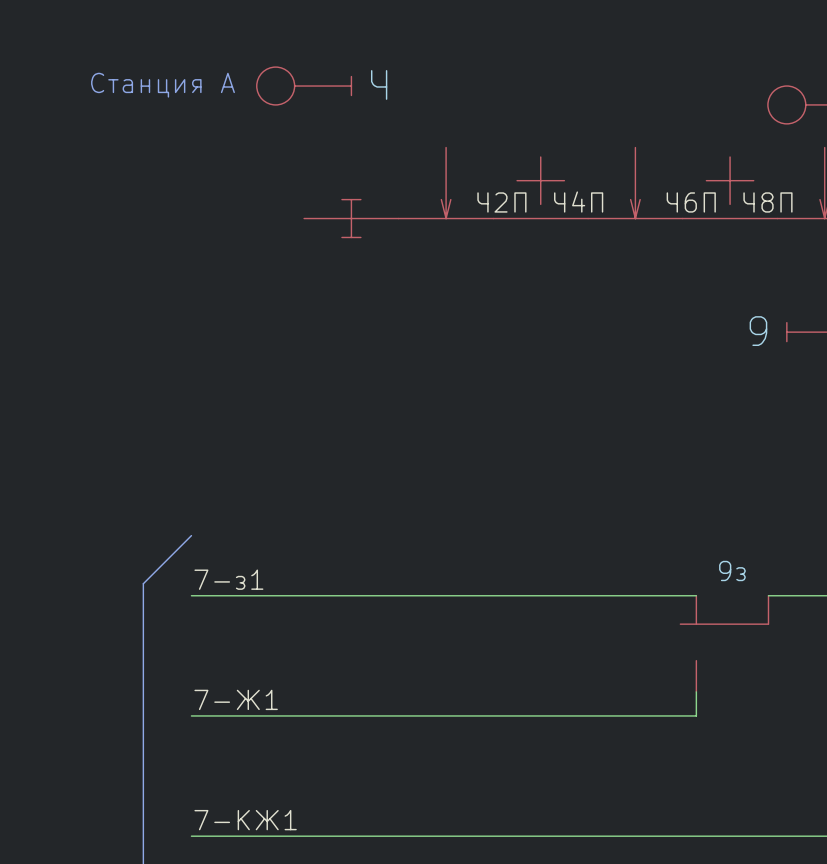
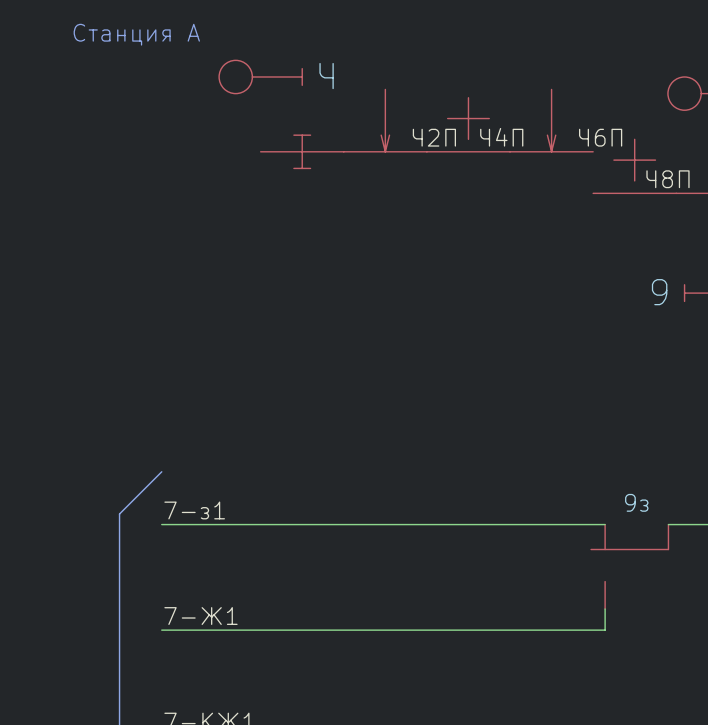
text position: Станция А (163, 85) -> Станция А (136, 34)
part position: (446, 183) -> (385, 120)
part position: (635, 183) -> (551, 120)
part position: (540, 187) -> (468, 124)
label position: Ч2П (501, 202) -> Ч2П (434, 137)
label position: Ч4П (578, 202) -> Ч4П (501, 137)
label position: Ч6П (691, 202) -> Ч6П (600, 137)
part position: (351, 218) -> (302, 151)

